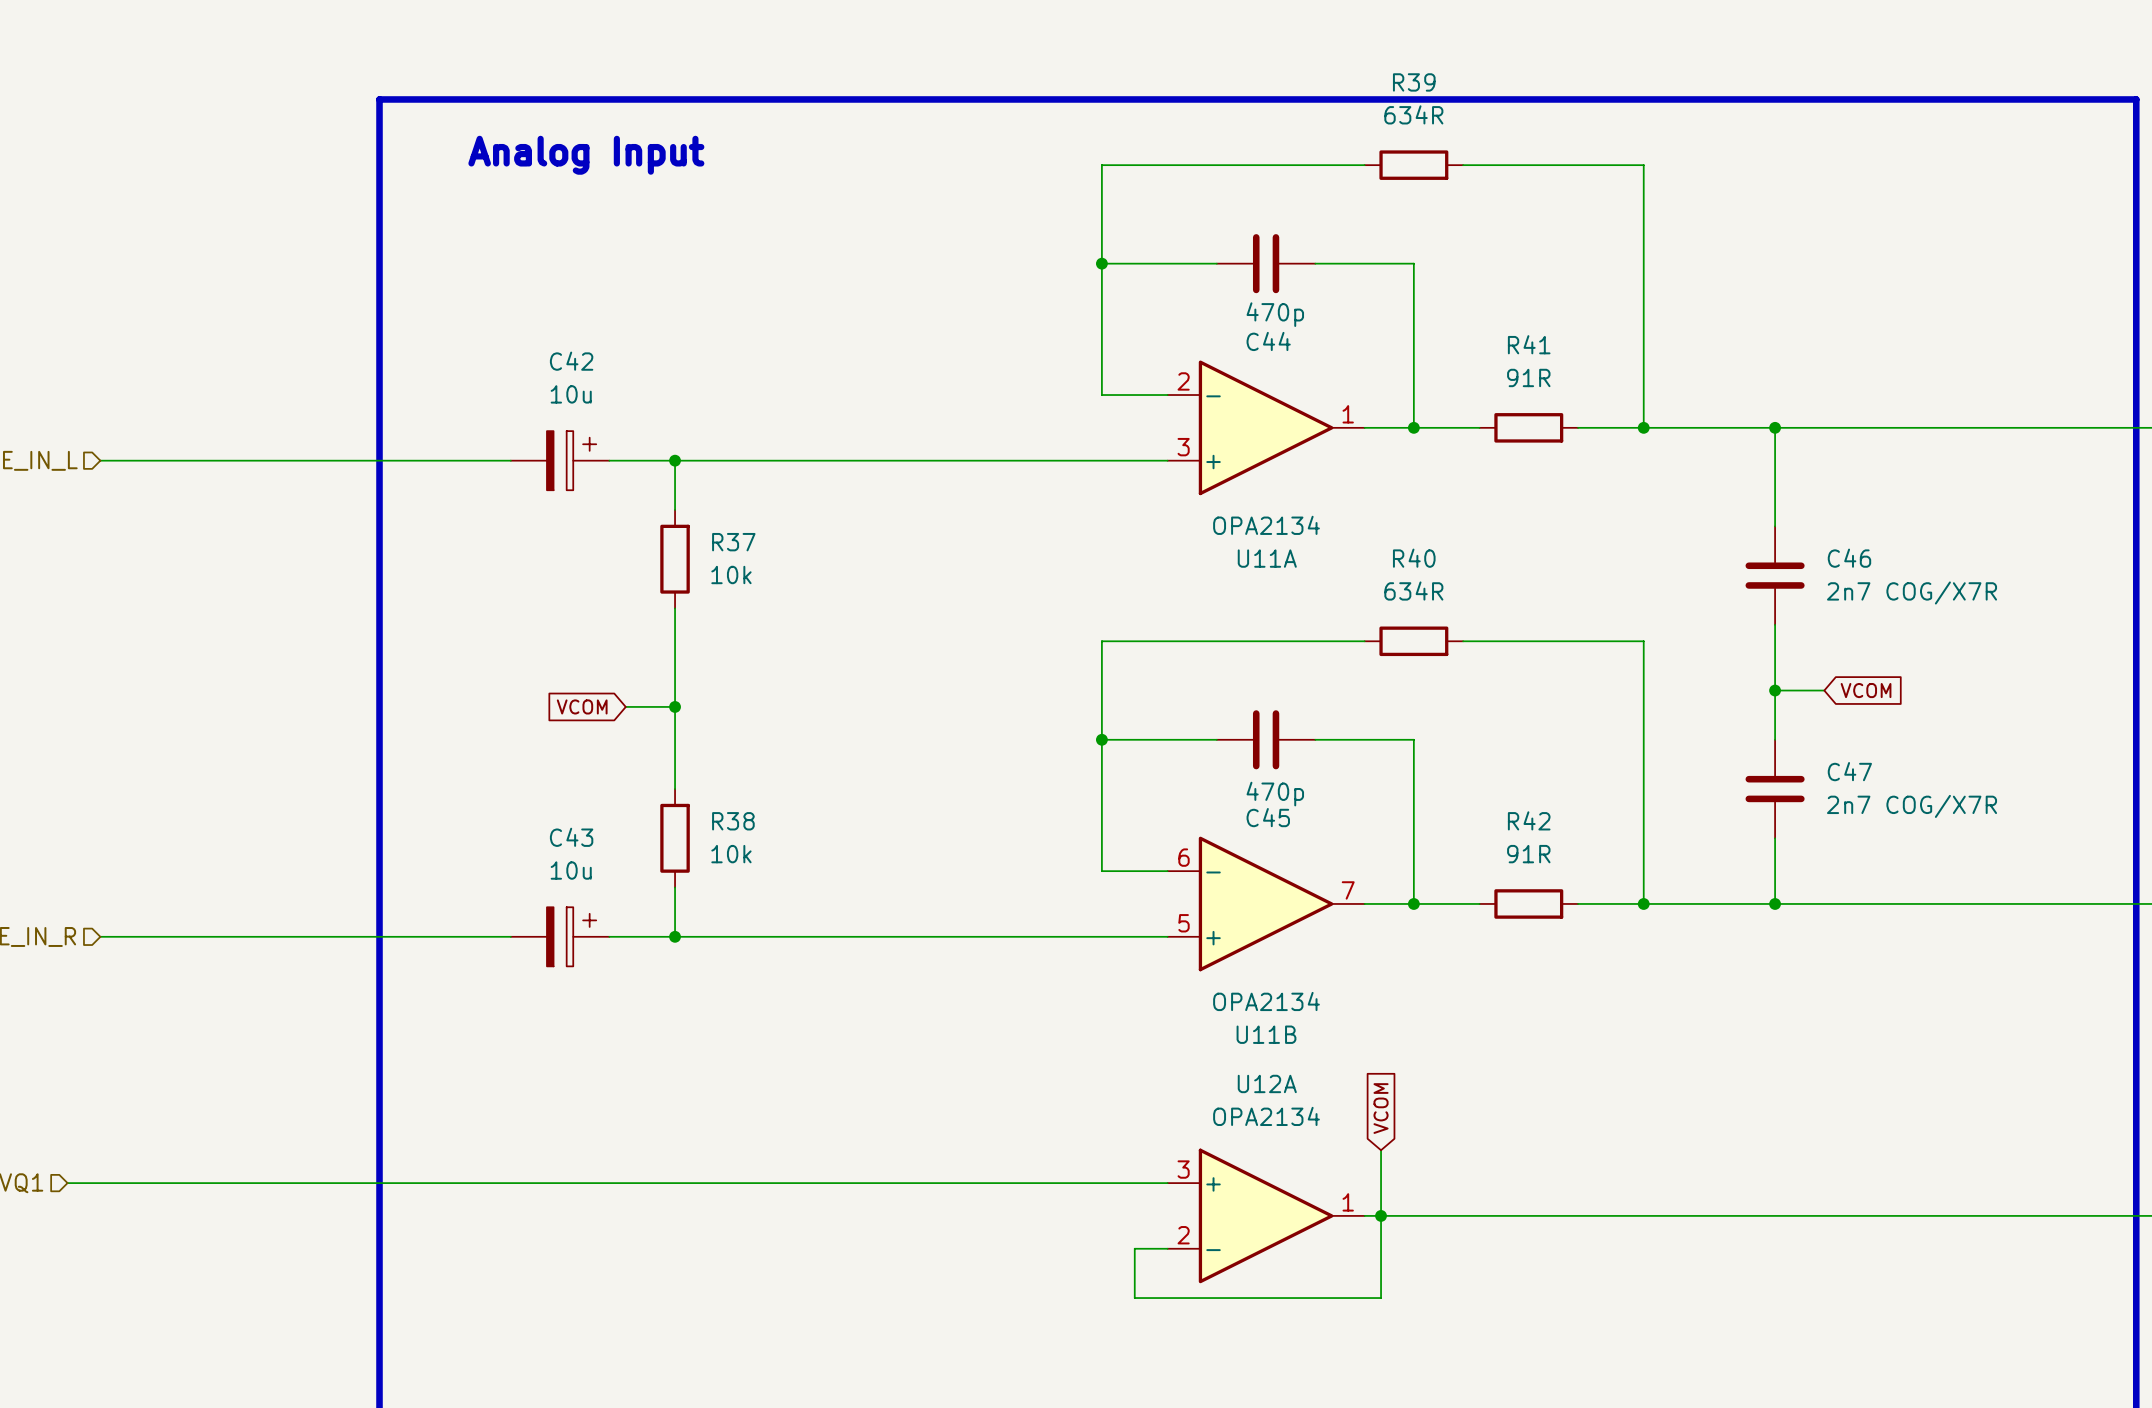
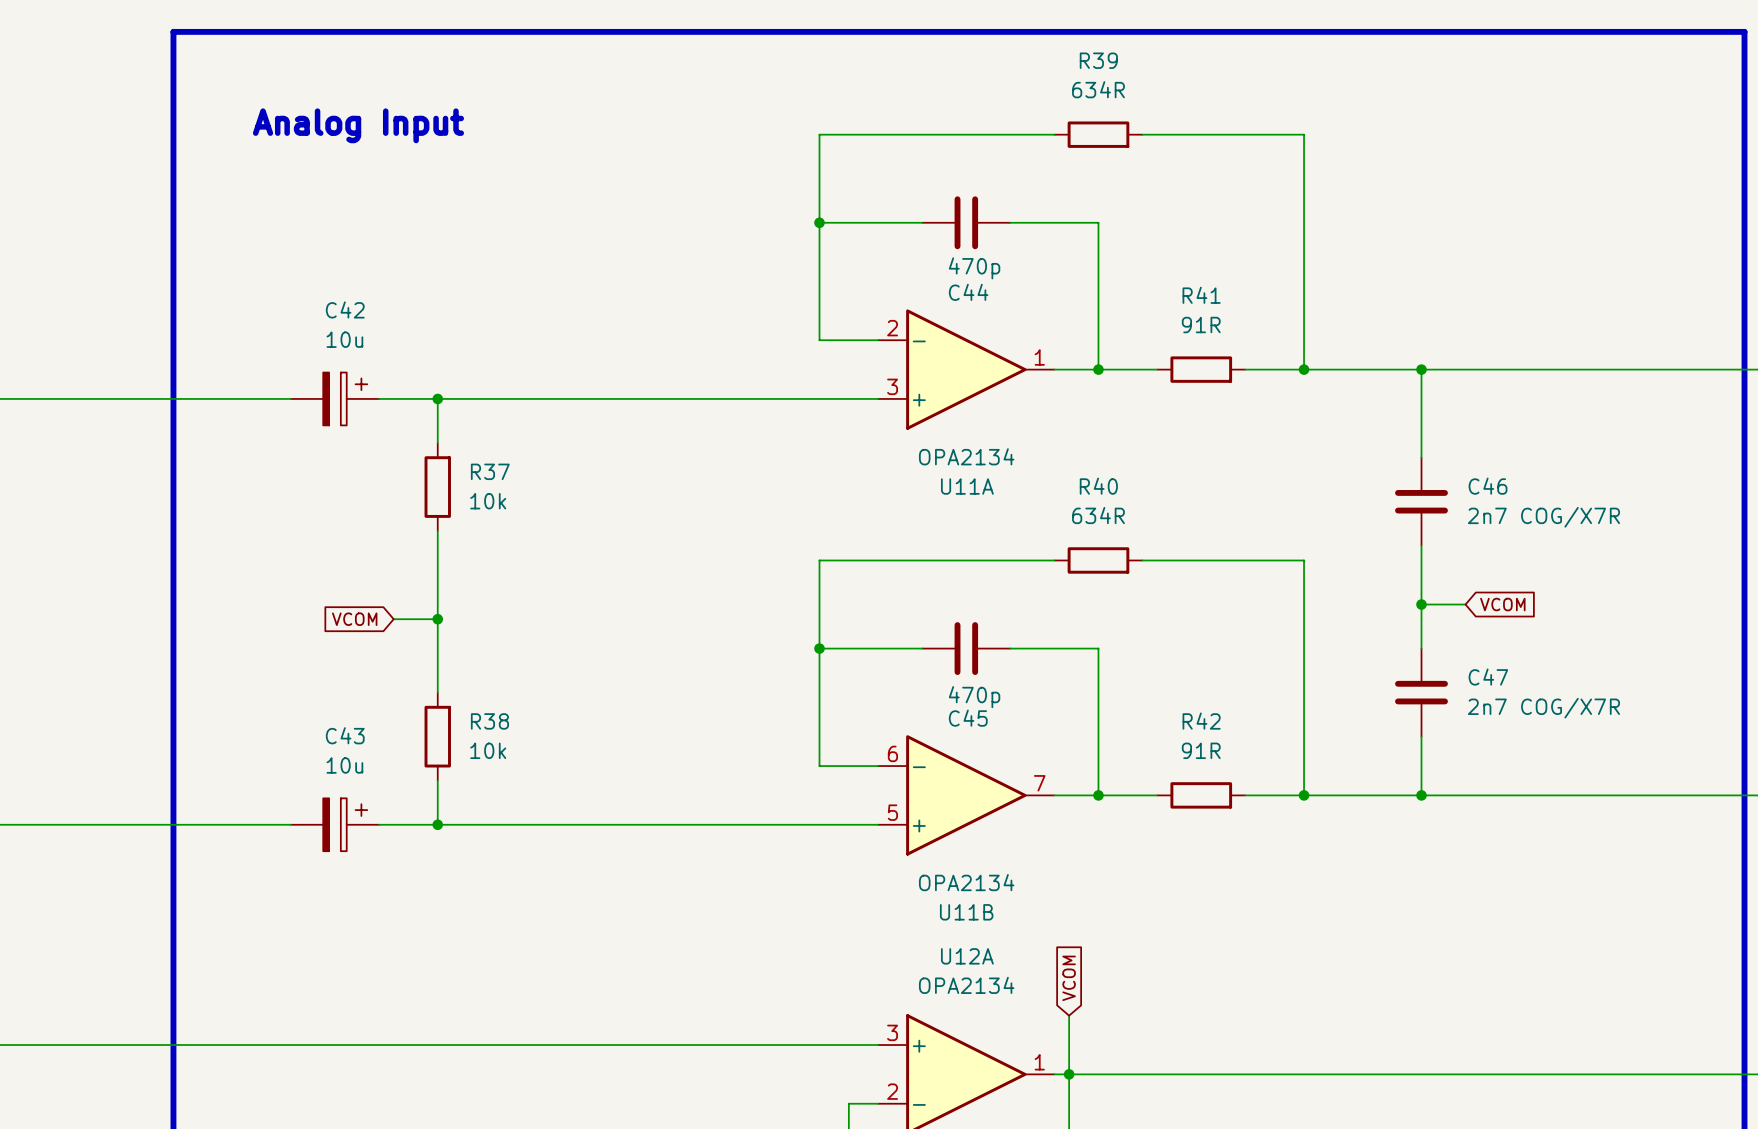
line: (379, 99) (2136, 99) -> (173, 75) (173, 31) (1744, 31) (1744, 75)

